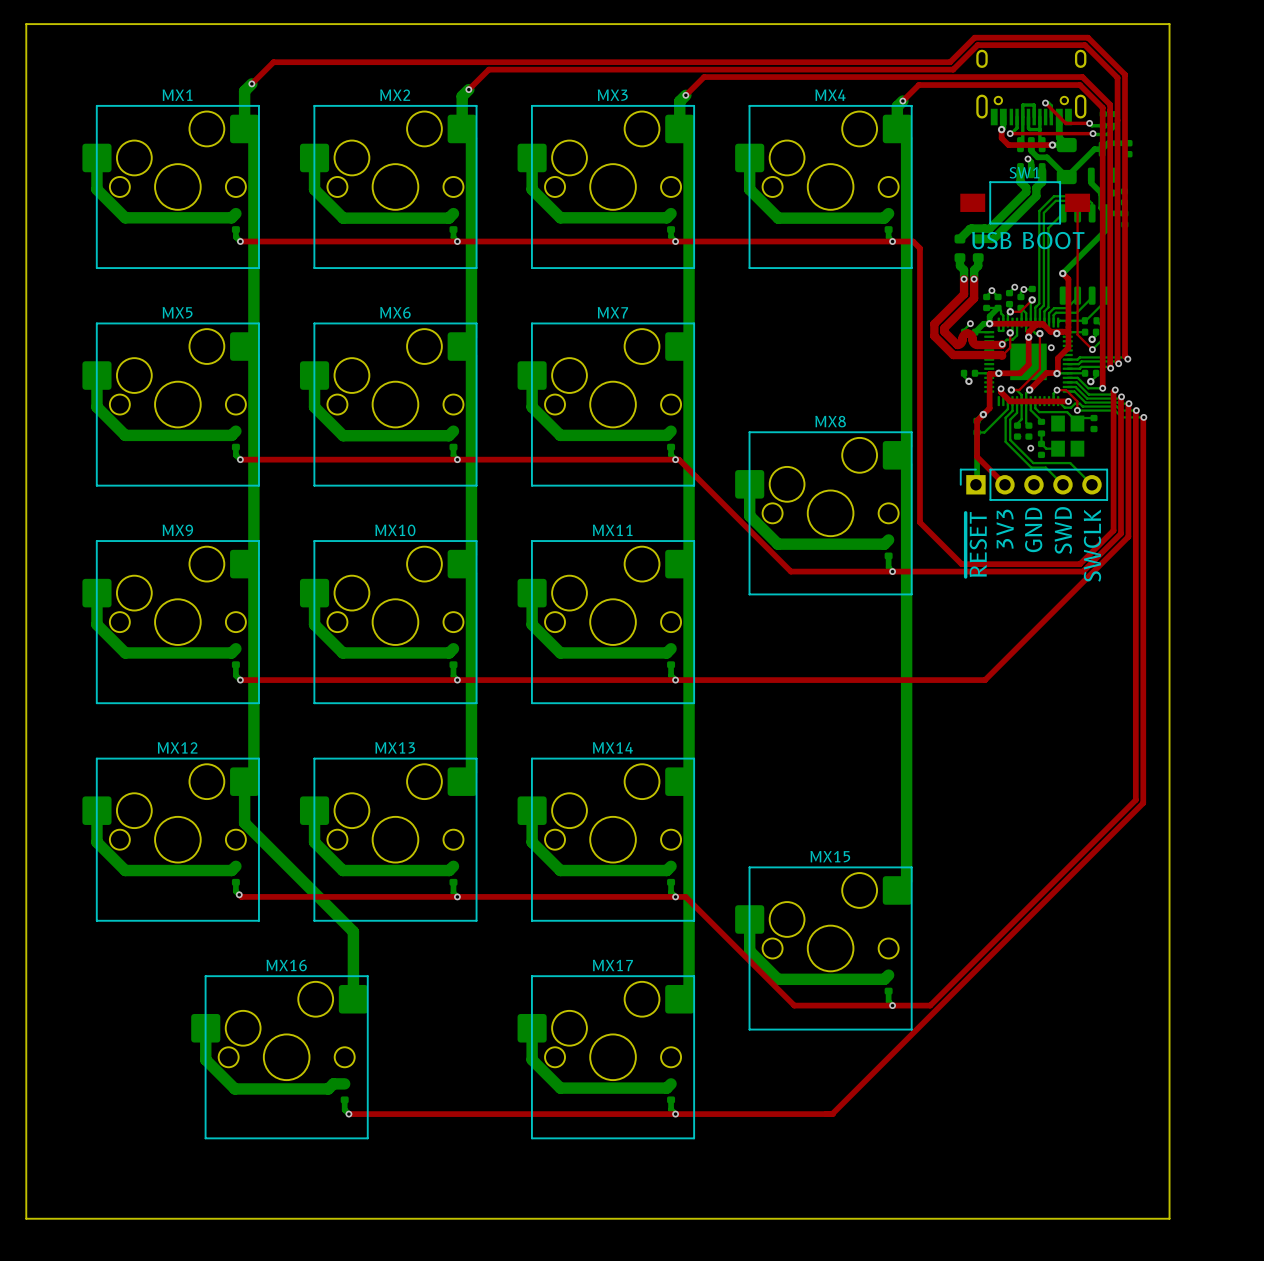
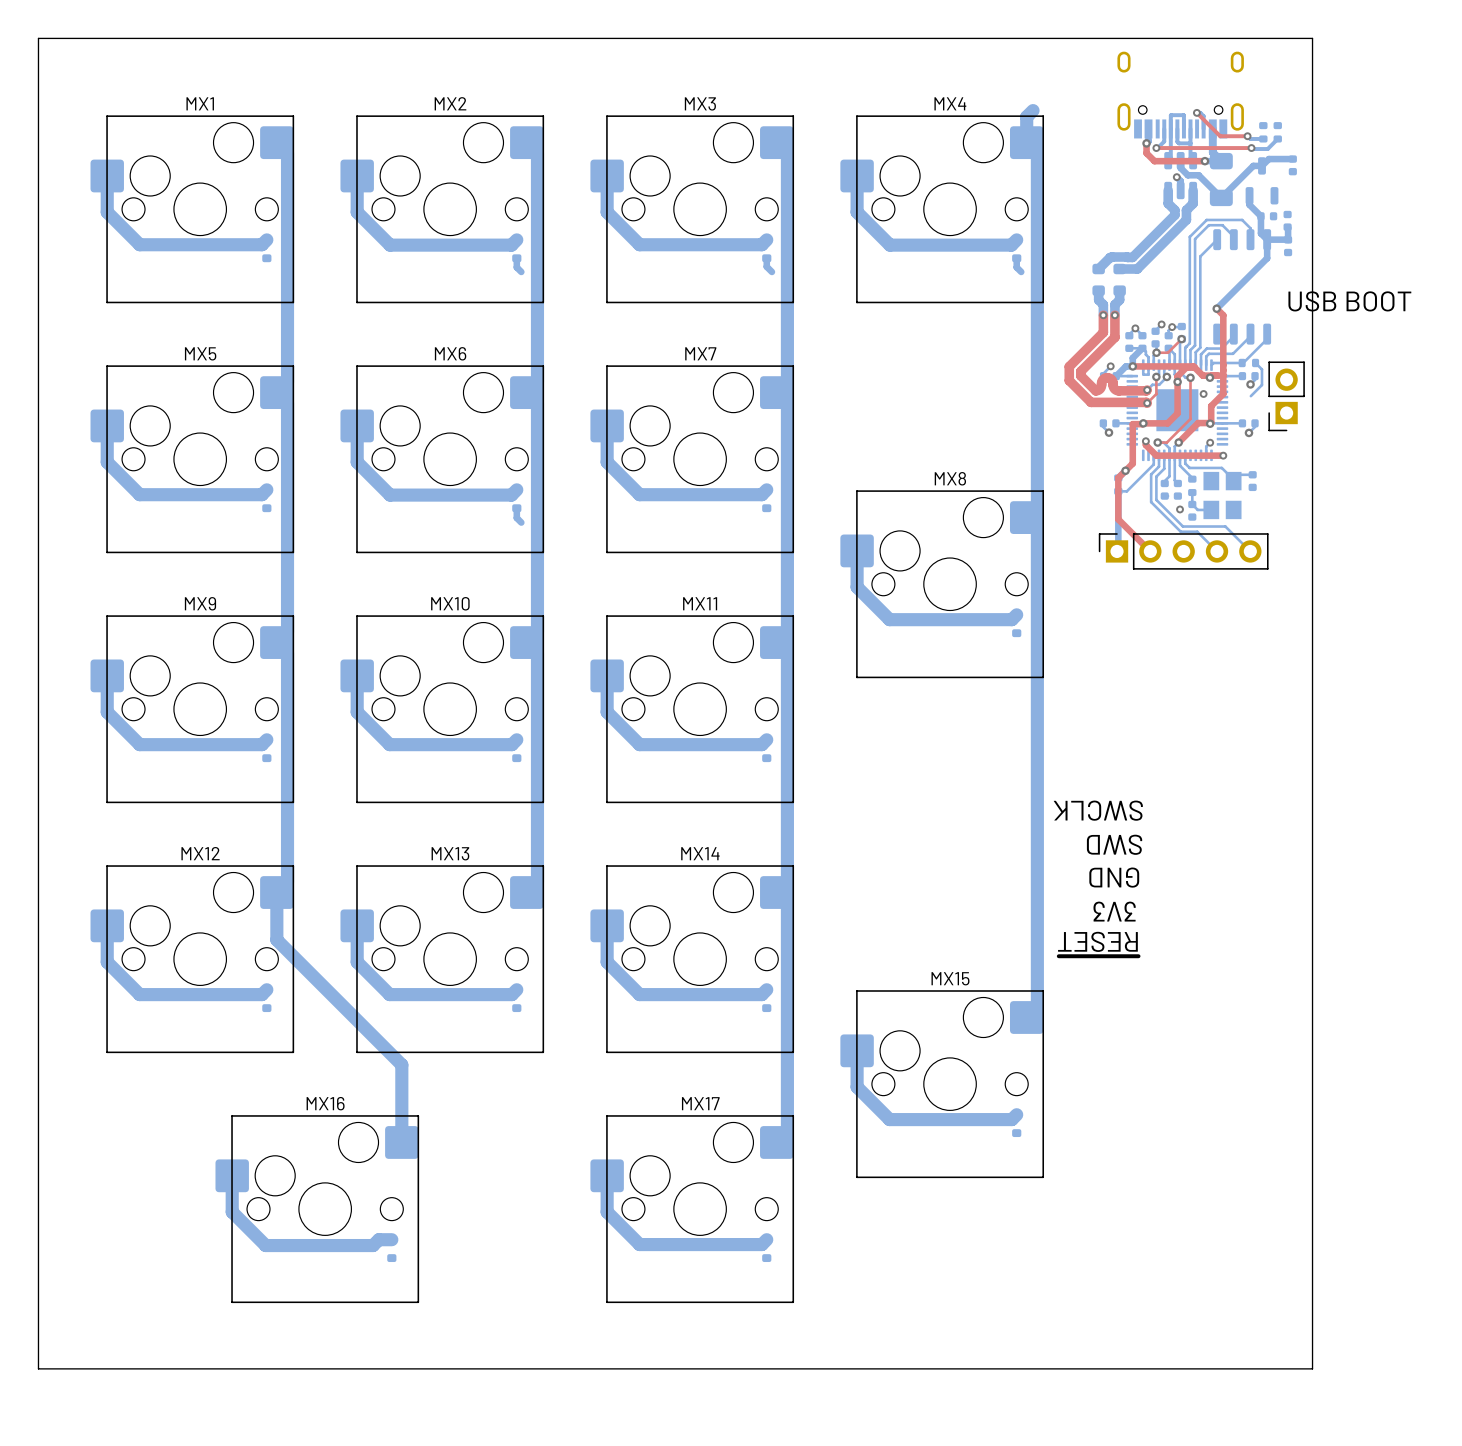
board edge: (26, 24) (1169, 24) (1169, 1218) (26, 1218) (26, 24) -> (38, 38) (38, 1368) (1312, 1368) (1312, 38) (38, 38)
top track: (251, 83) (273, 62) (950, 62) (974, 37) (1088, 37) (1124, 74) (1124, 356) (1127, 359) -> none
bottom track: (251, 83) (244, 91) (244, 128) -> none
via: (251, 83) -> none
top track: (468, 89) (488, 69) (953, 69) (977, 45) (1084, 45) (1117, 77) (1118, 363) -> none
bottom track: (468, 89) (462, 96) (462, 128) -> none
via: (468, 89) -> none
top track: (685, 95) (704, 77) (1082, 77) (1110, 104) (1110, 368) -> none
bottom track: (685, 95) (679, 101) (679, 128) -> none
via: (685, 95) -> none
top track: (902, 101) (918, 85) (1079, 85) (1102, 107) (1102, 388) -> none
via: (902, 101) -> none
SW1: (1025, 202) -> none
top track: (1077, 202) (1077, 334) (1092, 349) -> none
bottom track: (235, 229) (235, 237) (240, 241) -> none
text position: USB BOOT (1028, 240) -> USB BOOT (1349, 301)
top track: (240, 241) (913, 241) (919, 248) (919, 522) (961, 564) (1080, 564) (1113, 530) (1113, 391) (1115, 389) -> none
via: (240, 241) -> none
via: (457, 241) -> none
via: (675, 241) -> none
via: (892, 241) -> none
via: none -> (1166, 376)
via: (1092, 349) -> none
part: none -> (1286, 396)
via: none -> (1147, 403)
bottom track: (1127, 359) (1126, 357) (1079, 357) (1077, 359) (1067, 359) -> none
via: (1127, 359) -> none
bottom track: (1118, 363) (1116, 361) (1081, 361) (1078, 364) (1067, 364) -> none
via: (1118, 363) -> none
bottom track: (1110, 368) (1081, 366) (1079, 368) (1067, 368) -> none
via: (1110, 368) -> none
bottom track: (1067, 377) (1077, 377) (1088, 388) (1102, 388) -> none
bottom track: (1067, 382) (1076, 382) (1088, 394) (1110, 394) (1115, 389) -> none
bottom track: (1067, 386) (1075, 386) (1087, 398) (1119, 398) (1121, 396) -> none
via: (1102, 388) -> none
via: (1115, 389) -> none
top track: (1057, 390) (1066, 390) (1077, 401) (1077, 410) -> none
bottom track: (1067, 391) (1074, 391) (1085, 402) (1128, 403) -> none
top track: (1121, 396) (1120, 533) (1083, 571) (790, 571) (678, 459) (240, 459) -> none
via: (1121, 396) -> none
bottom track: (1058, 401) (1064, 407) (1071, 407) (1075, 403) (1079, 403) (1082, 406) (1116, 406) (1120, 410) (1136, 410) -> none
top track: (1128, 403) (1128, 536) (985, 680) (240, 680) -> none
via: (1128, 403) -> none
bottom track: (1077, 410) (1115, 410) (1121, 417) (1143, 417) -> none
via: (1077, 410) -> none
top track: (1136, 410) (1135, 800) (930, 1005) (794, 1005) (685, 896) (241, 896) (239, 894) -> none
via: (1136, 410) -> none
top track: (1143, 417) (1143, 803) (832, 1114) -> none
via: (1143, 417) -> none
bottom track: (235, 447) (235, 455) (240, 459) -> none
bottom track: (671, 447) (671, 455) (675, 459) -> none
via: (240, 459) -> none
via: (457, 459) -> none
via: (675, 459) -> none
text rotation: 0° (1005, 529) -> 90° counterclockwise (1114, 911)
text position: 3V3 (1005, 529) -> 3V3 (1114, 911)
text rotation: 0° (1033, 529) -> 90° counterclockwise (1114, 877)
text position: GND (1033, 529) -> GND (1114, 877)
text rotation: 0° (1063, 530) -> 90° counterclockwise (1114, 844)
text position: SWD (1063, 530) -> SWD (1114, 844)
text rotation: 0° (976, 544) -> 90° counterclockwise (1098, 944)
text position: ~{RESET} (976, 544) -> ~{RESET} (1098, 944)
text rotation: 0° (1092, 545) -> 90° counterclockwise (1098, 810)
text position: SWCLK (1092, 545) -> SWCLK (1098, 810)
bottom track: (888, 555) (888, 567) (892, 571) -> none
via: (892, 571) -> none
bottom track: (235, 664) (235, 675) (240, 680) -> none
bottom track: (453, 664) (453, 676) (457, 680) -> none
bottom track: (671, 664) (671, 675) (675, 680) -> none
via: (240, 680) -> none
via: (457, 680) -> none
via: (675, 680) -> none
bottom track: (235, 882) (235, 891) (239, 894) -> none
bottom track: (453, 882) (453, 892) (457, 896) -> none
bottom track: (671, 882) (671, 892) (675, 896) -> none
via: (239, 894) -> none
via: (457, 896) -> none
via: (675, 896) -> none
bottom track: (888, 991) (888, 1001) (892, 1005) -> none
via: (892, 1005) -> none
bottom track: (344, 1099) (344, 1109) (348, 1114) -> none
bottom track: (671, 1099) (671, 1109) (675, 1114) -> none
top track: (348, 1114) (833, 1114) -> none
via: (348, 1114) -> none
via: (675, 1114) -> none

